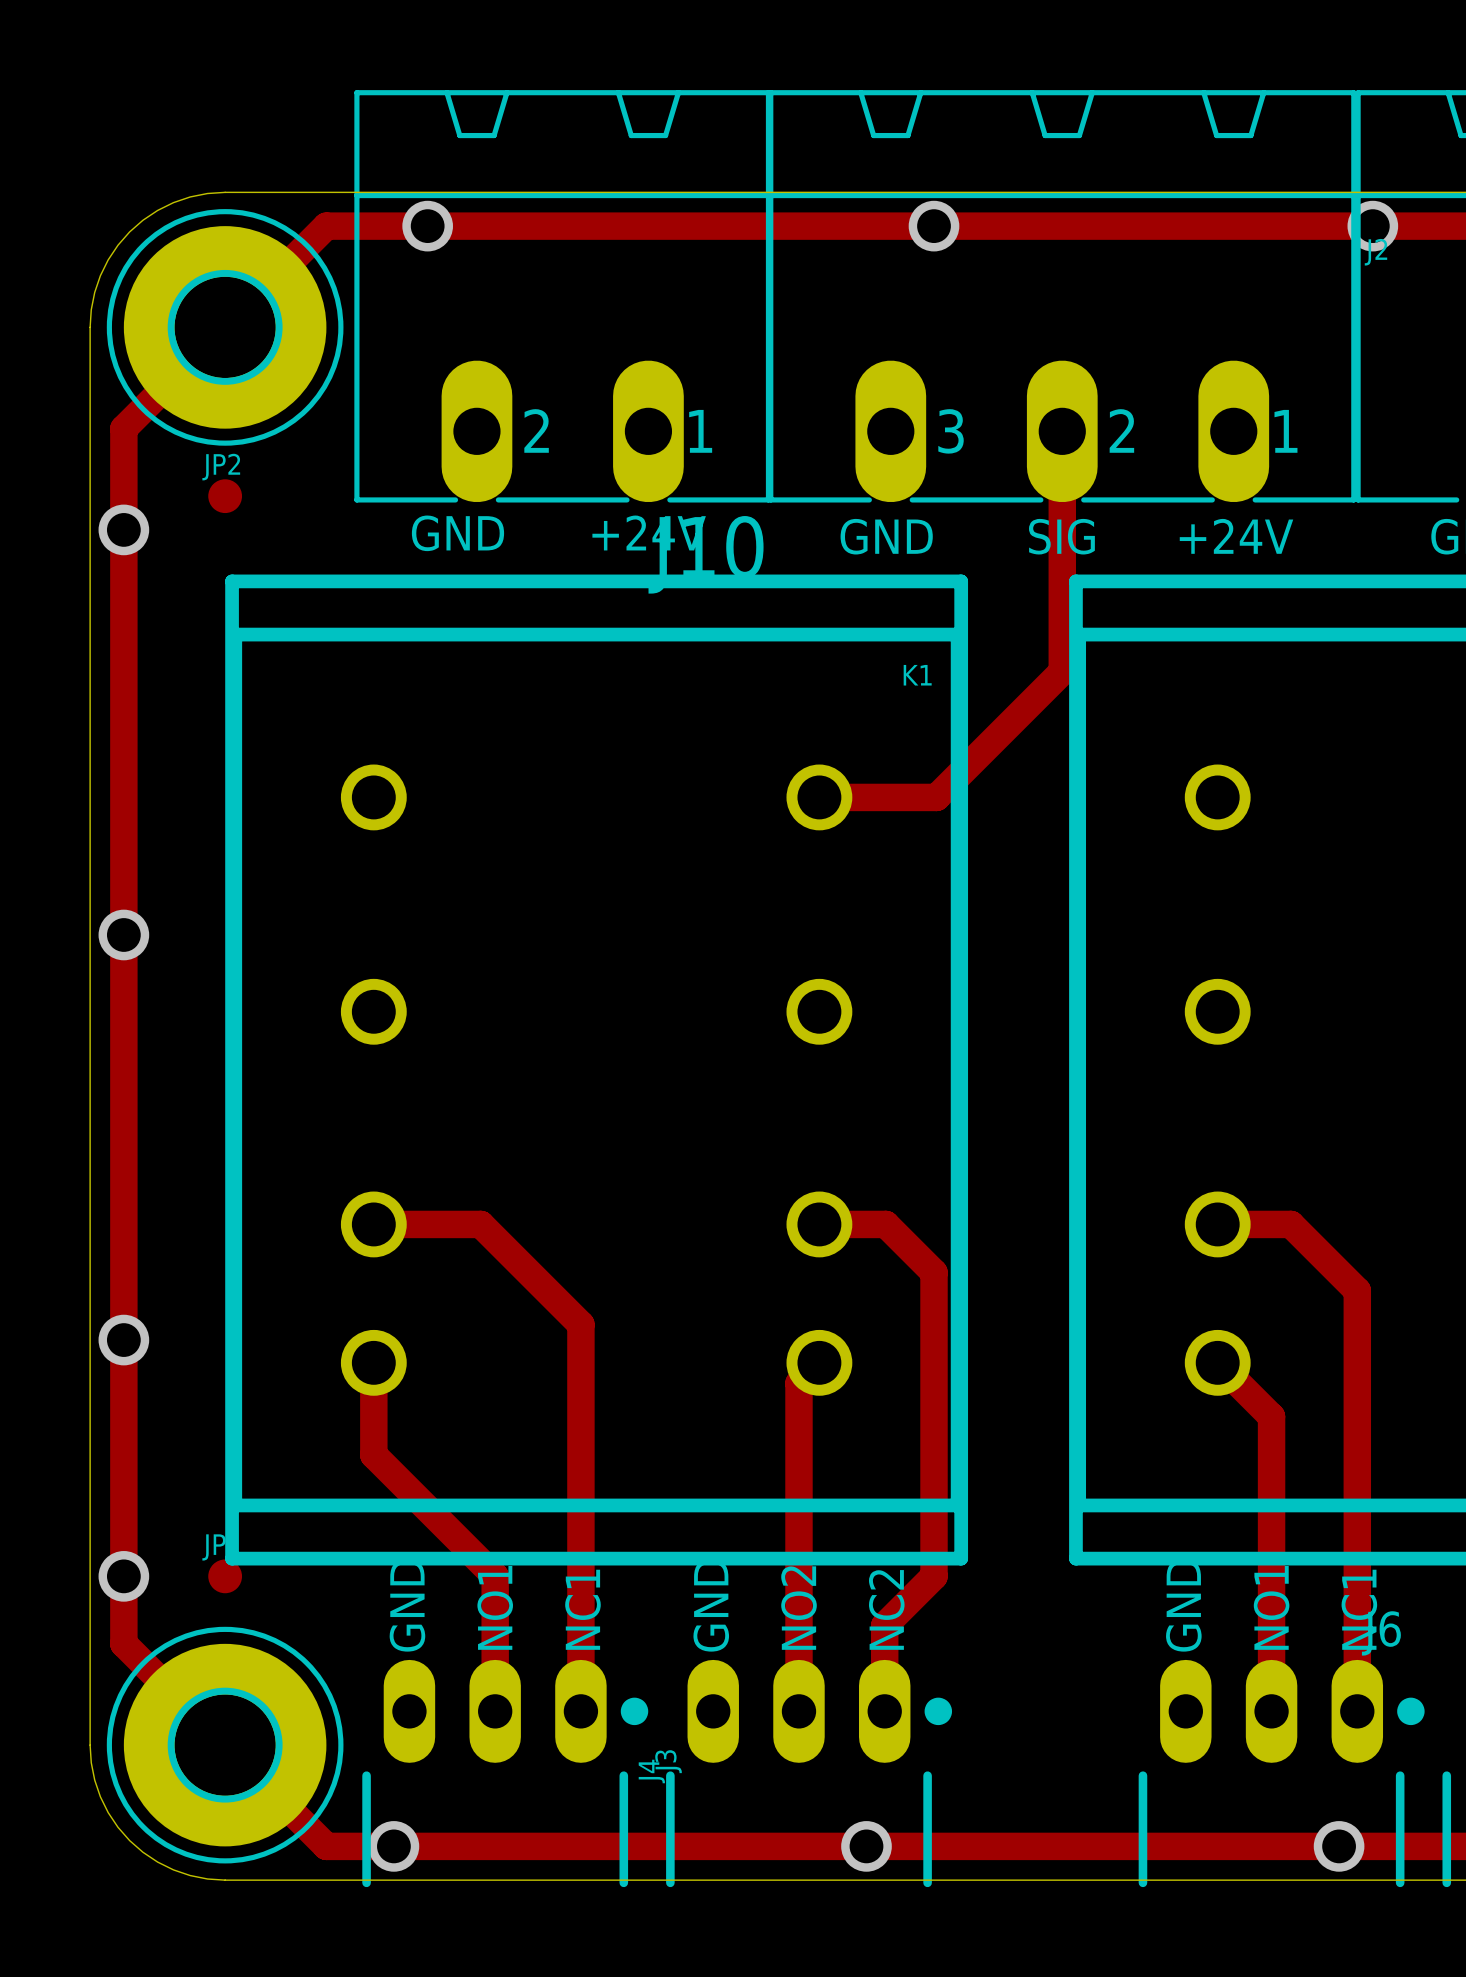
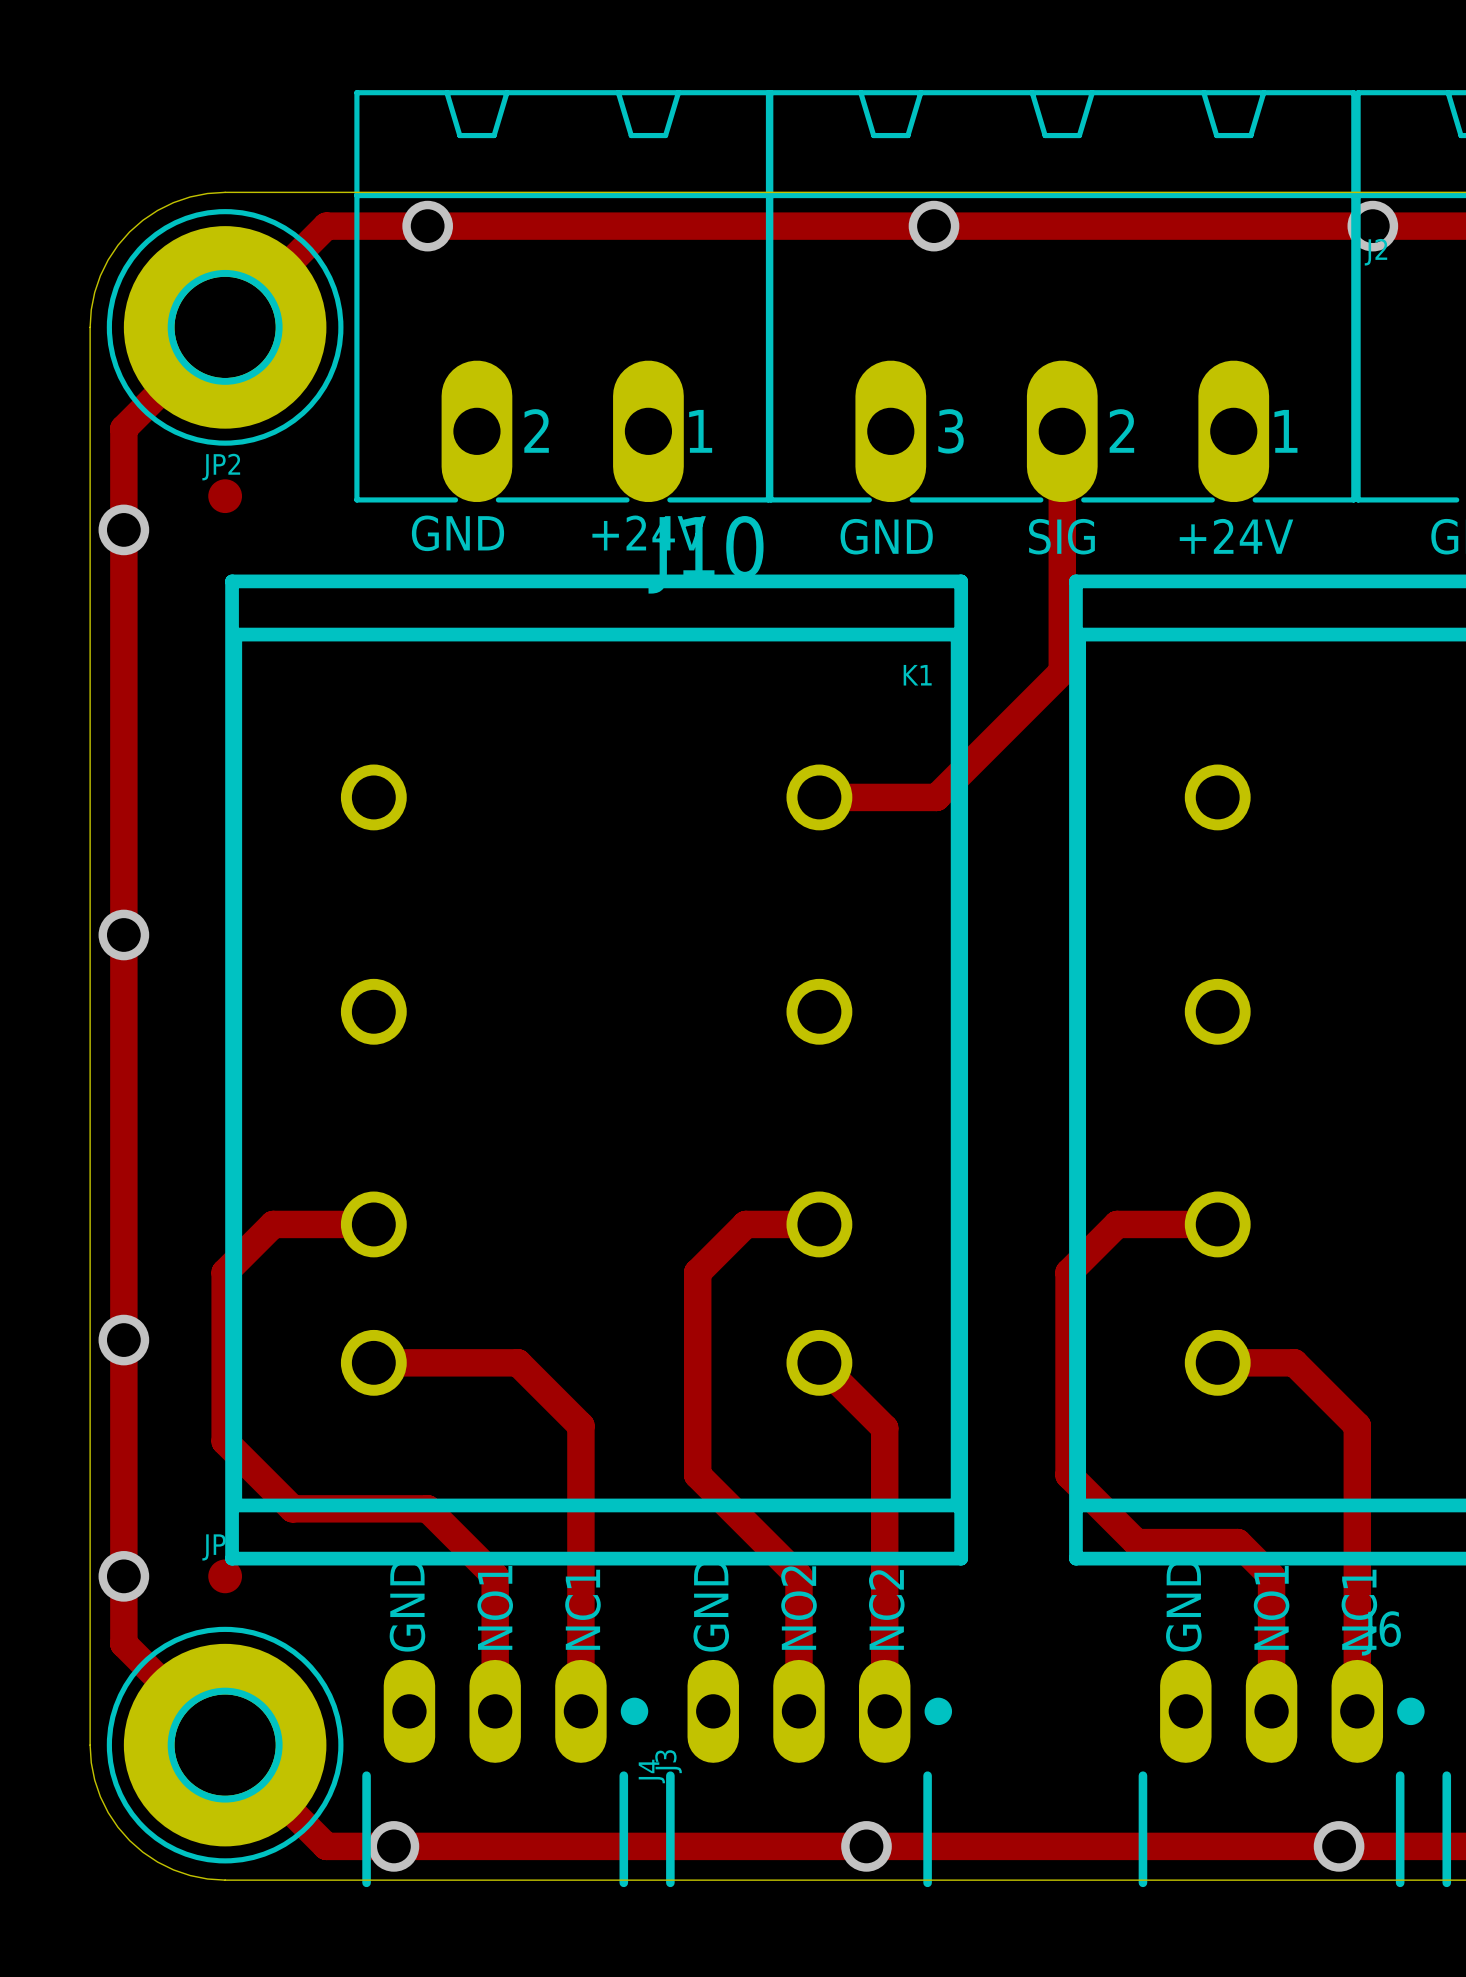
track: (373, 1224) (480, 1224) (580, 1324) (580, 1425) -> (373, 1362) (517, 1362) (580, 1425)
track: (819, 1224) (885, 1224) (934, 1272) (934, 1576) (884, 1625) -> (819, 1224) (745, 1224) (697, 1272) (697, 1475) (798, 1576)
track: (1217, 1224) (1290, 1224) (1357, 1290) (1357, 1425) -> (1217, 1362) (1294, 1362) (1357, 1425)
track: (373, 1362) (373, 1455) (427, 1508) -> (373, 1224) (273, 1224) (225, 1272) (225, 1441) (292, 1508) (427, 1508)
track: (819, 1362) (798, 1383) (798, 1576) -> (819, 1362) (884, 1428) (884, 1625)
track: (1217, 1362) (1271, 1416) (1271, 1576) -> (1217, 1224) (1117, 1224) (1069, 1272) (1069, 1475) (1136, 1542) (1237, 1542) (1271, 1576)

